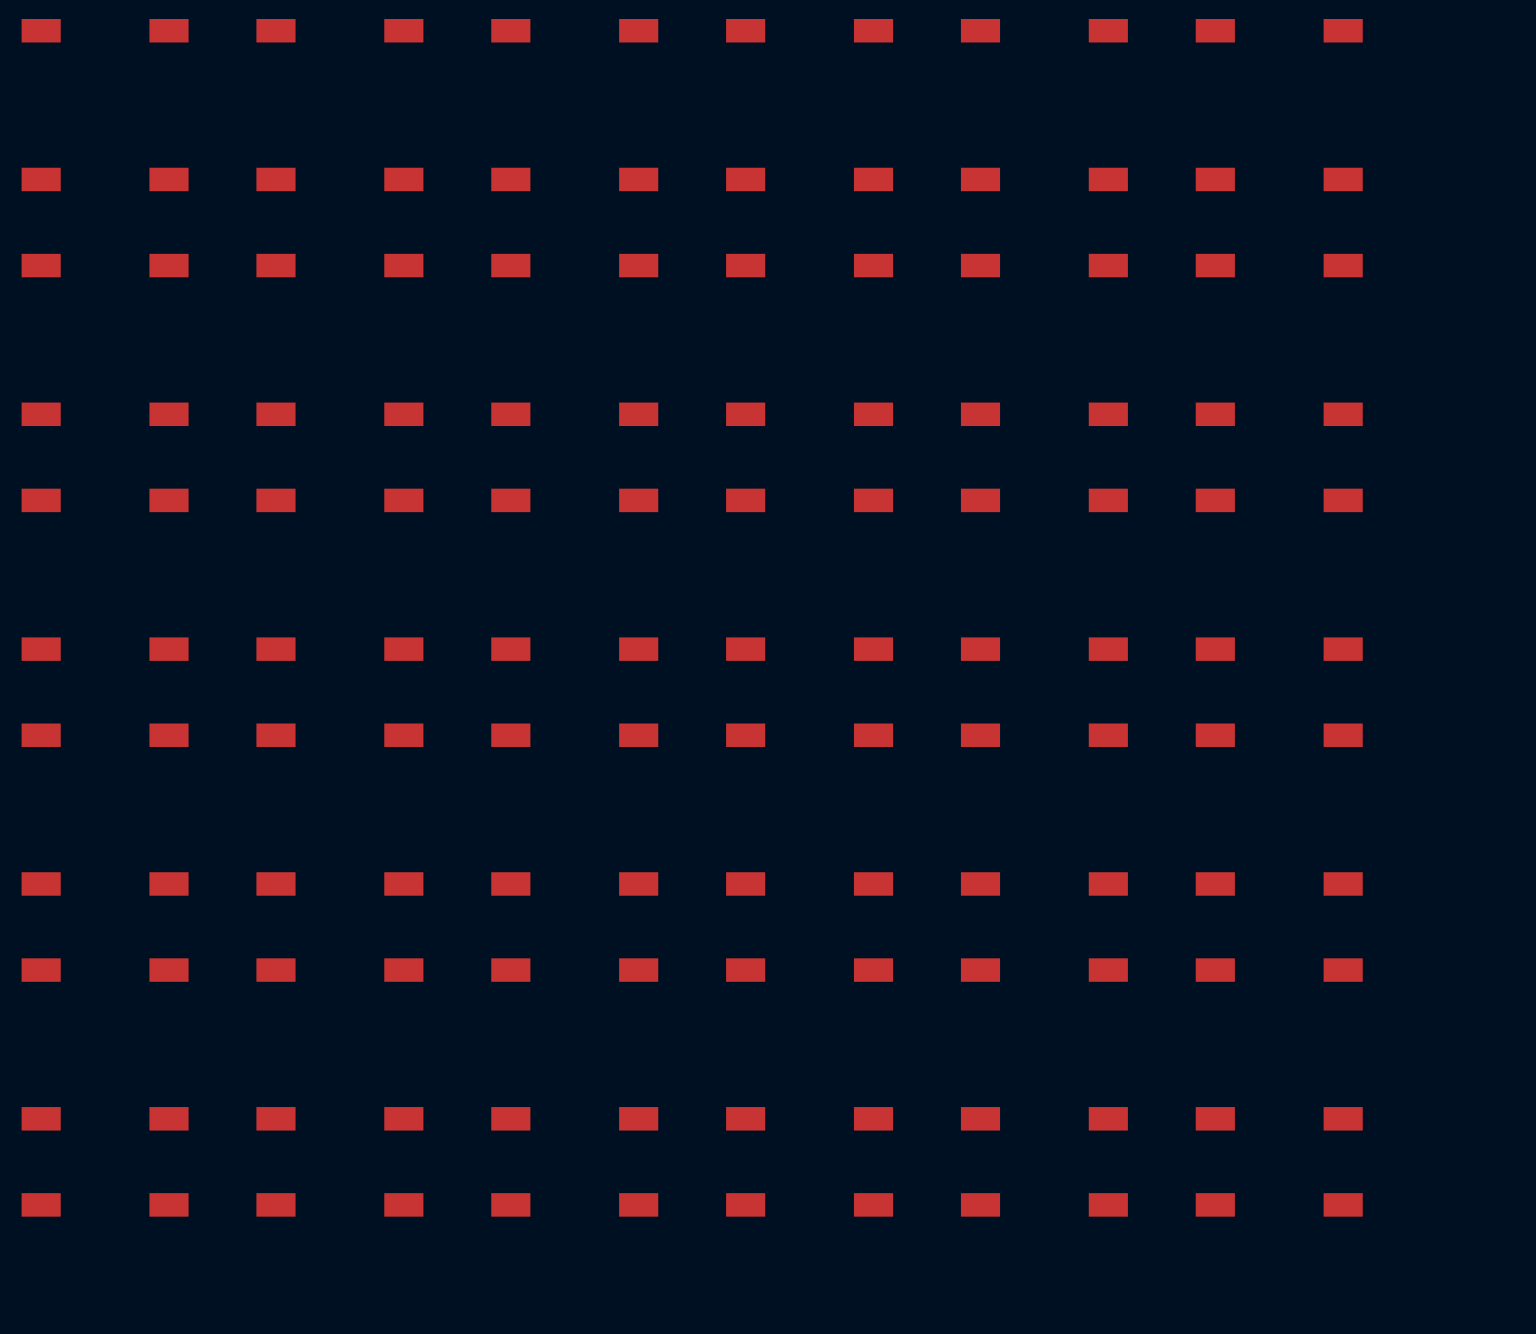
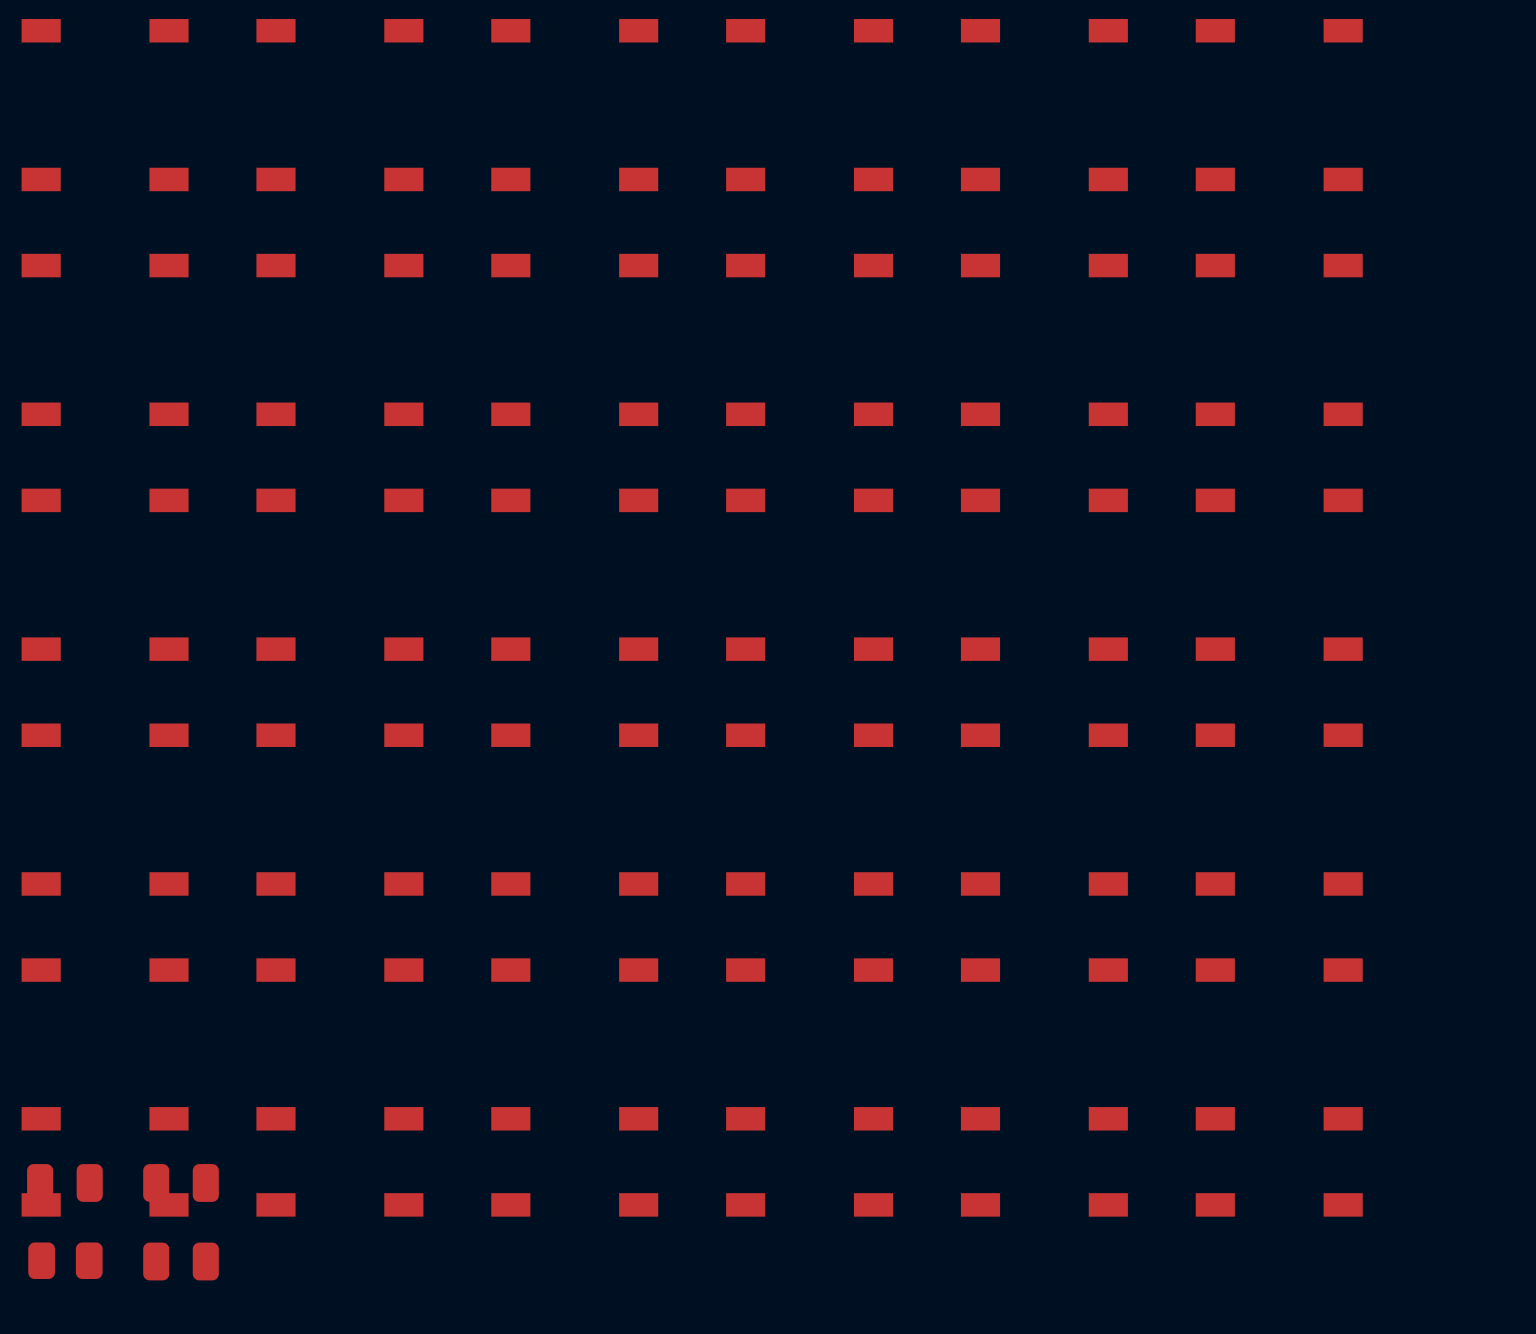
part: none -> (64, 1182)
part: none -> (181, 1182)
part: none -> (65, 1260)
part: none -> (181, 1261)

